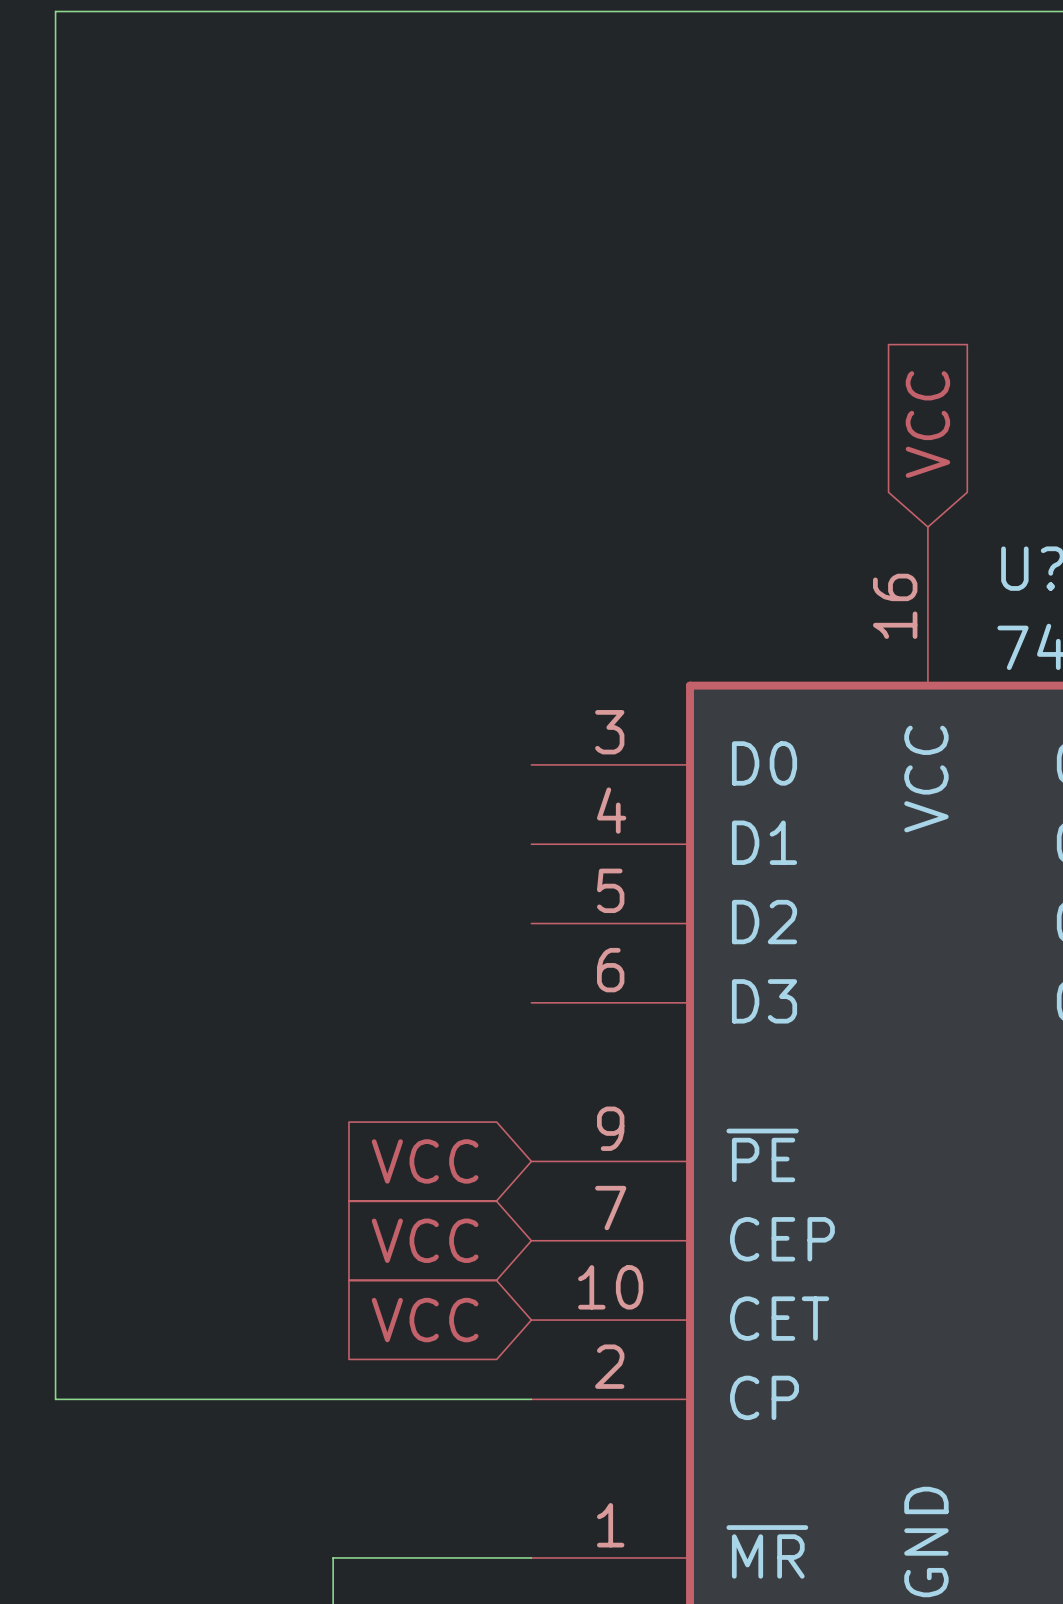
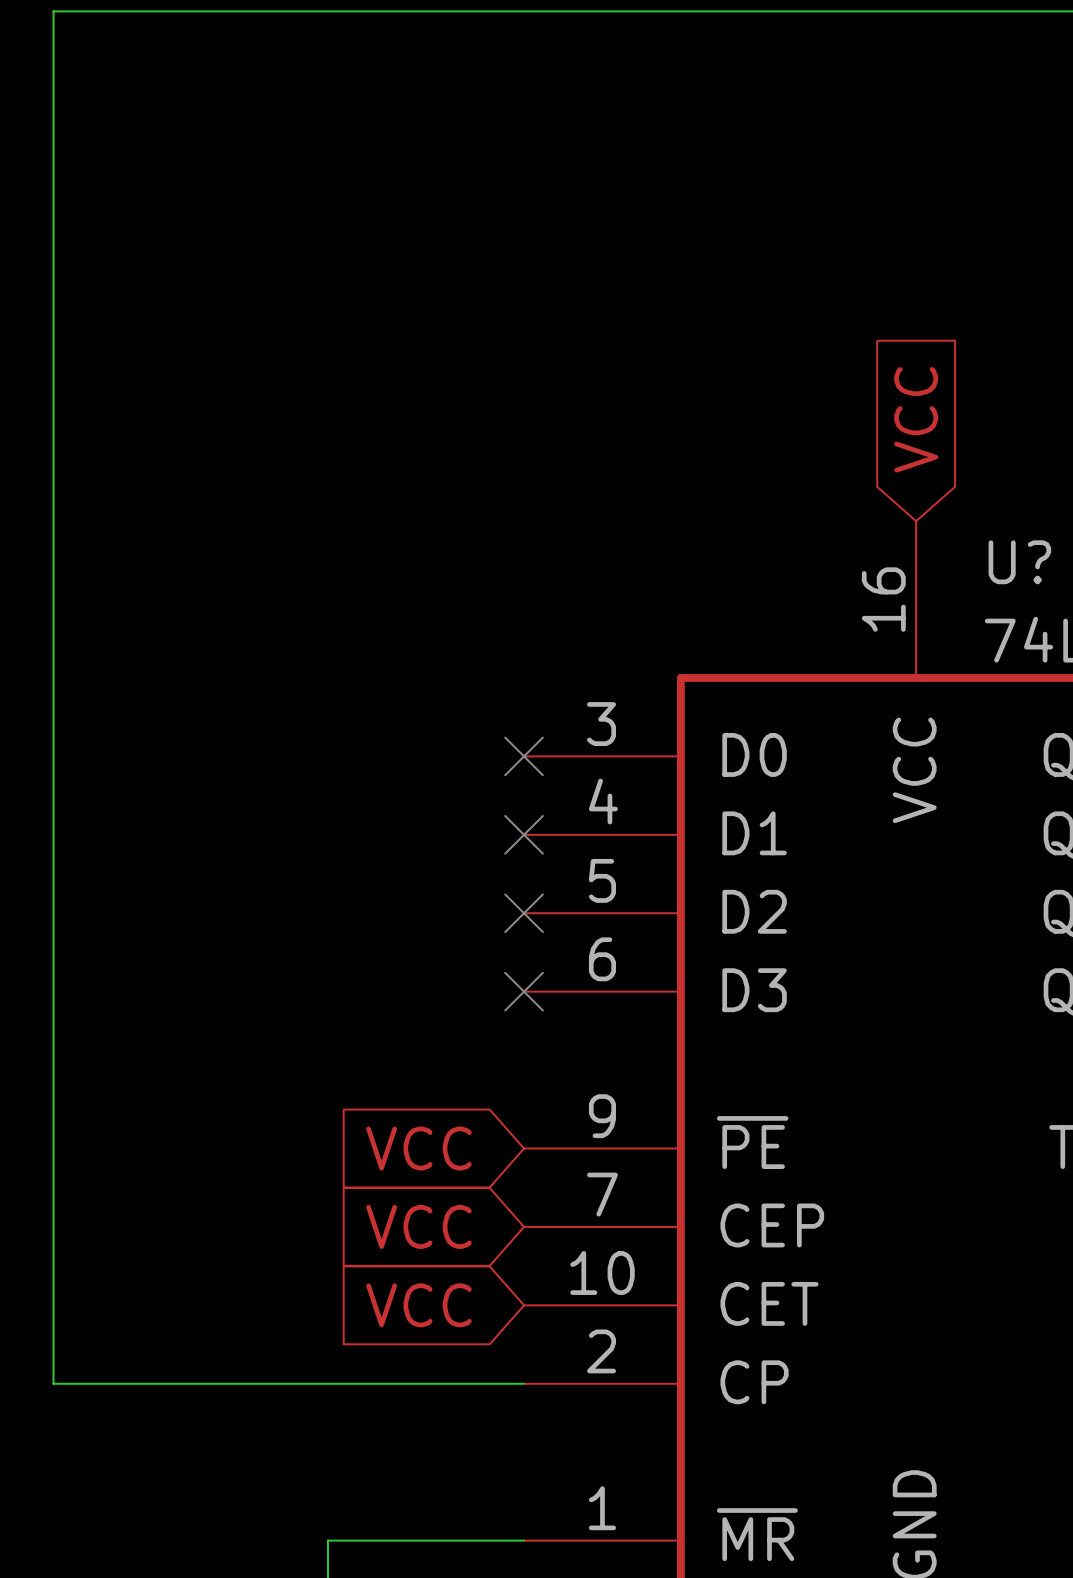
no-connect mark: none -> (524, 756)
no-connect mark: none -> (524, 834)
no-connect mark: none -> (524, 913)
no-connect mark: none -> (524, 991)

